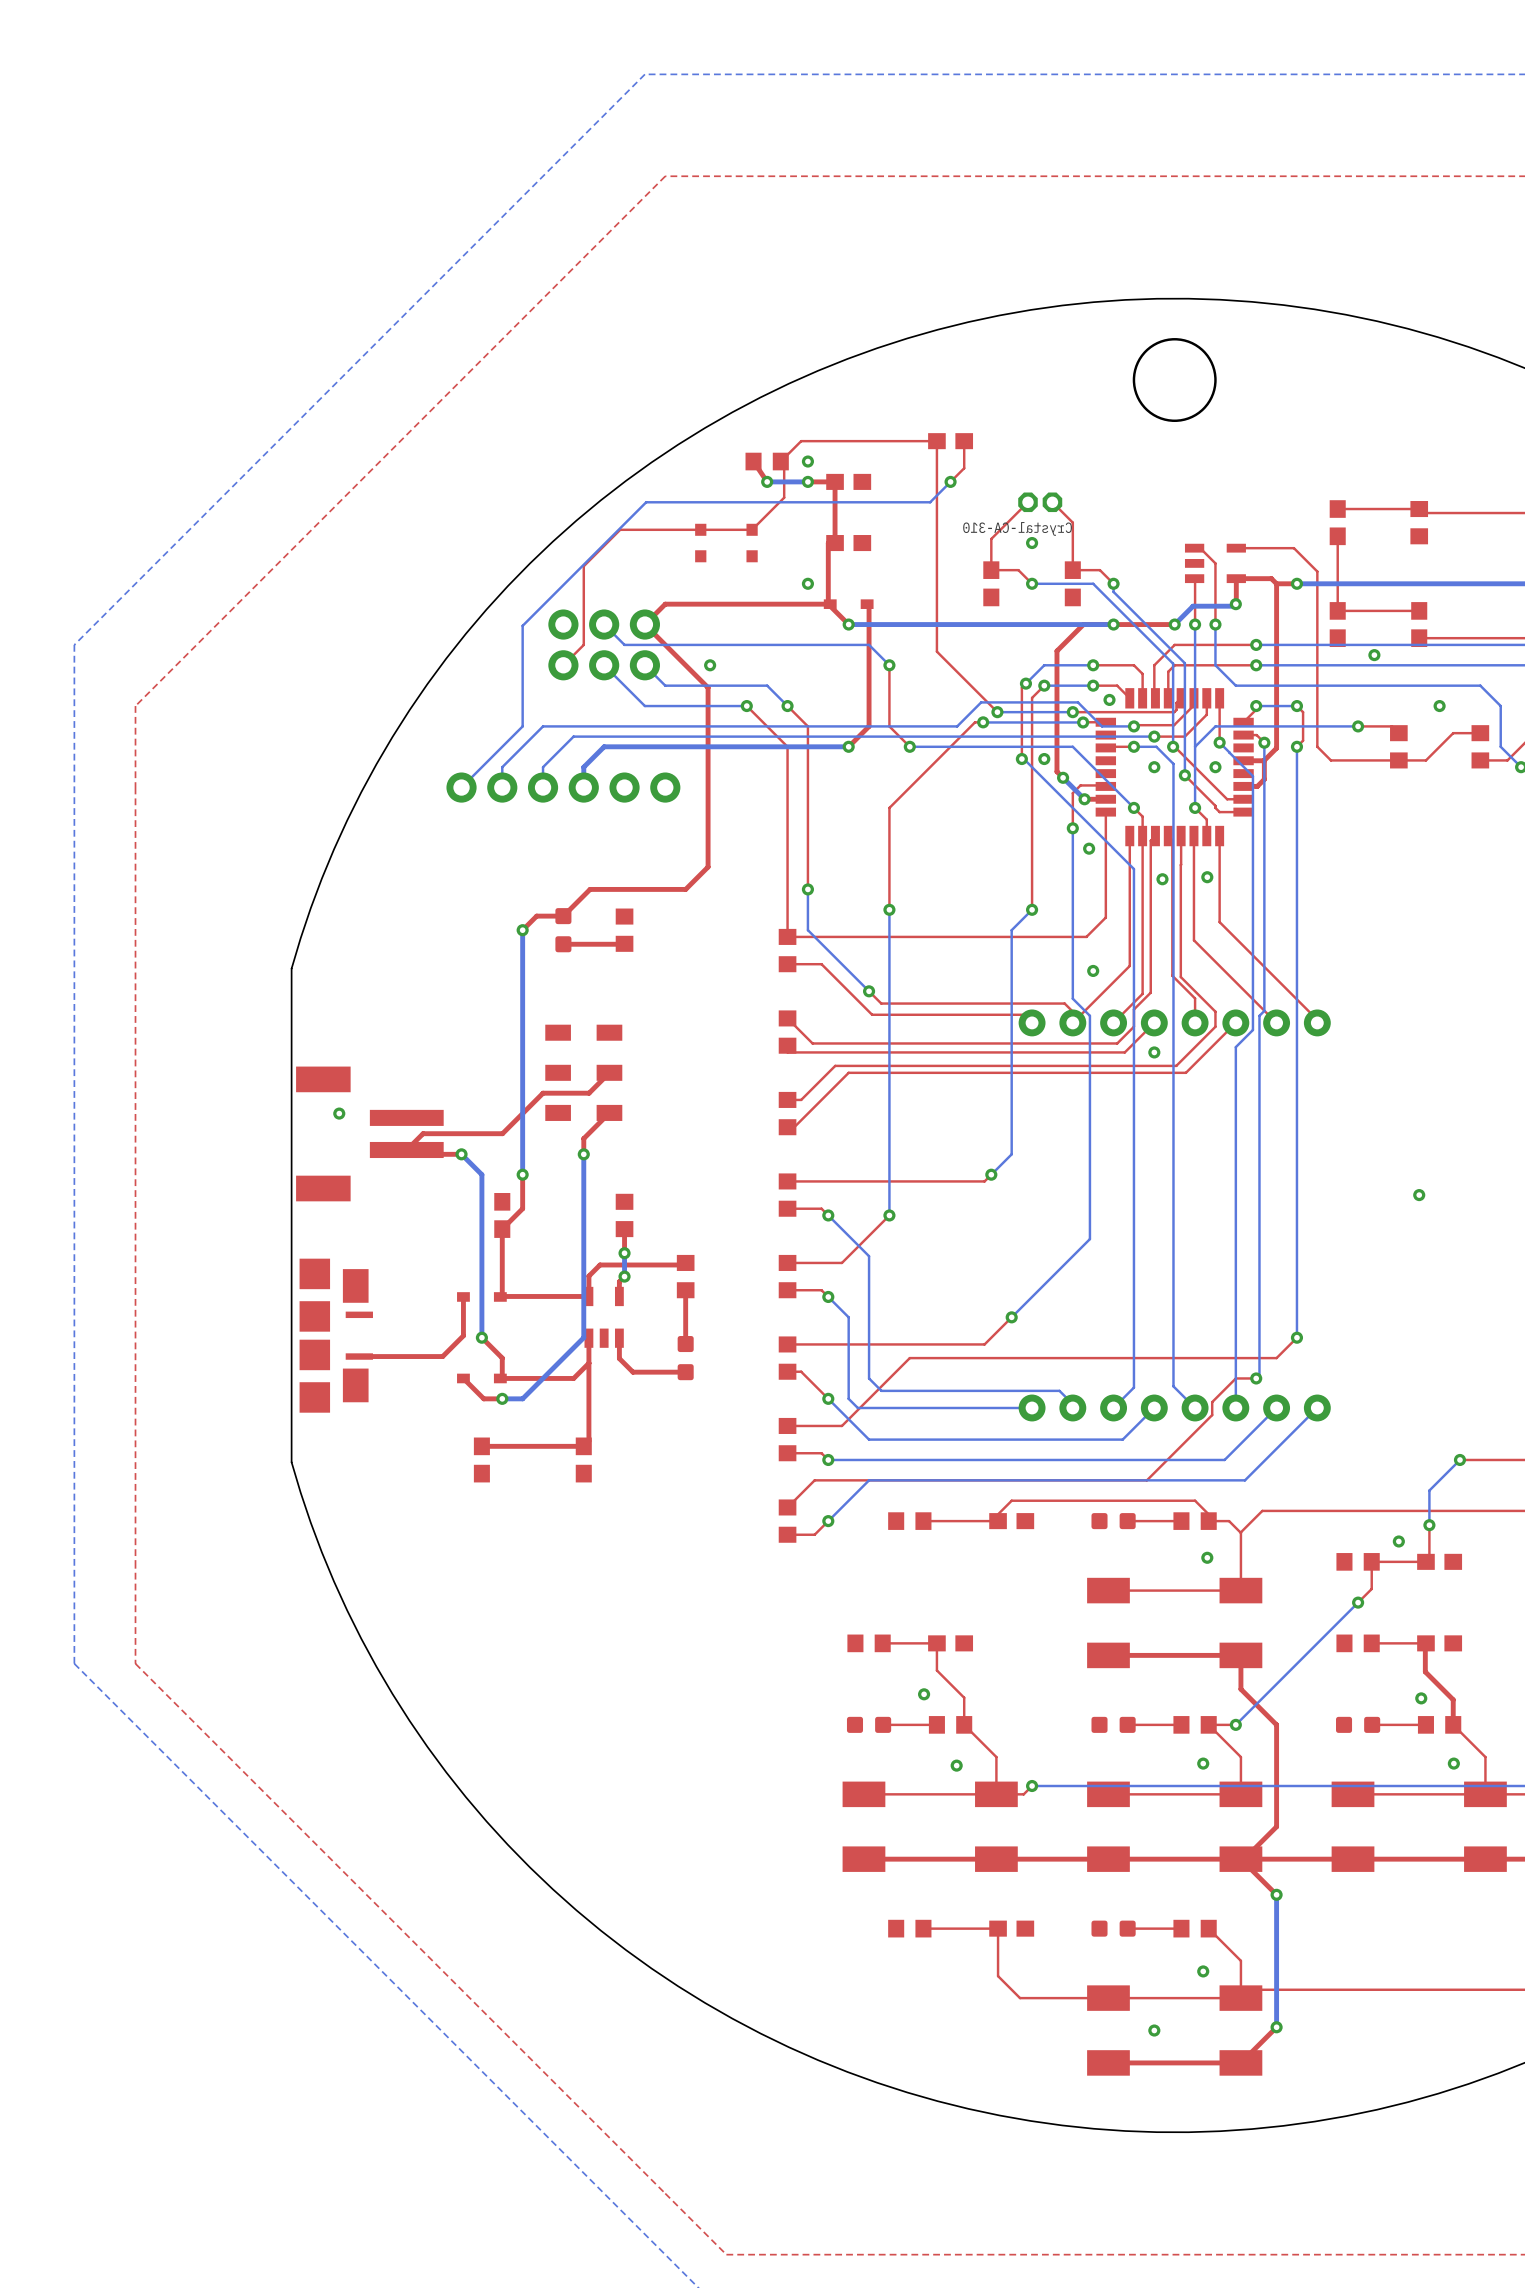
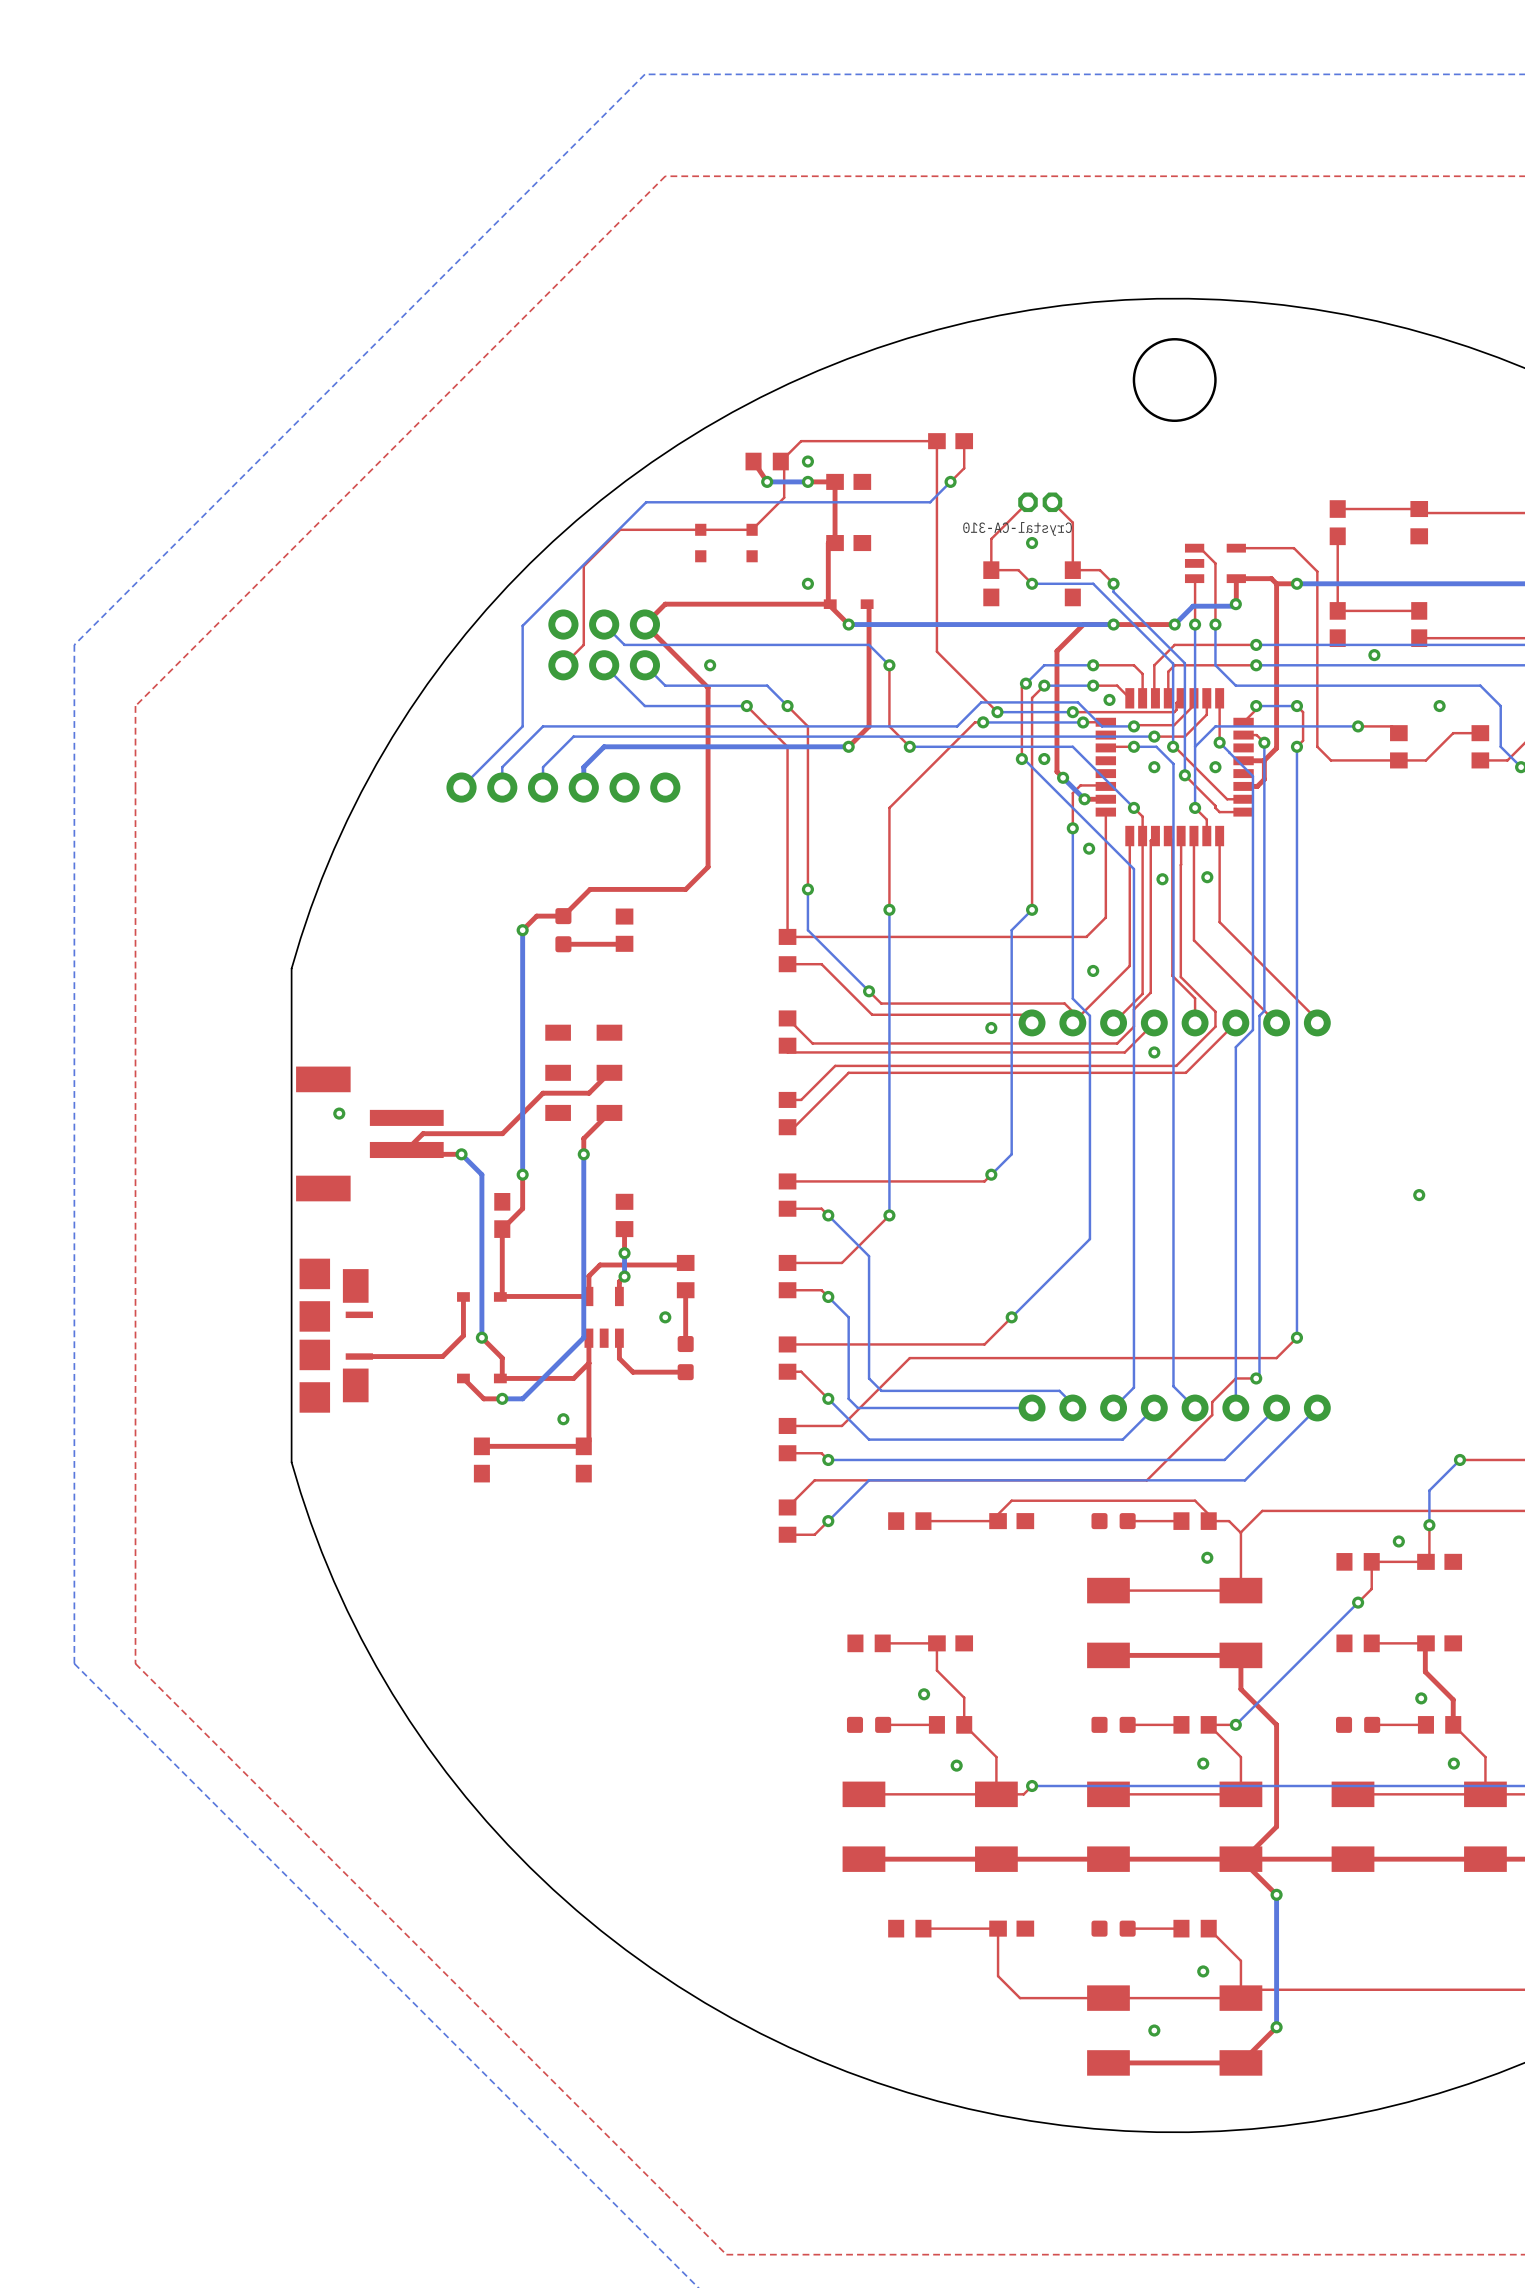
via: none -> (991, 1027)
via: none -> (665, 1317)
via: none -> (563, 1419)

